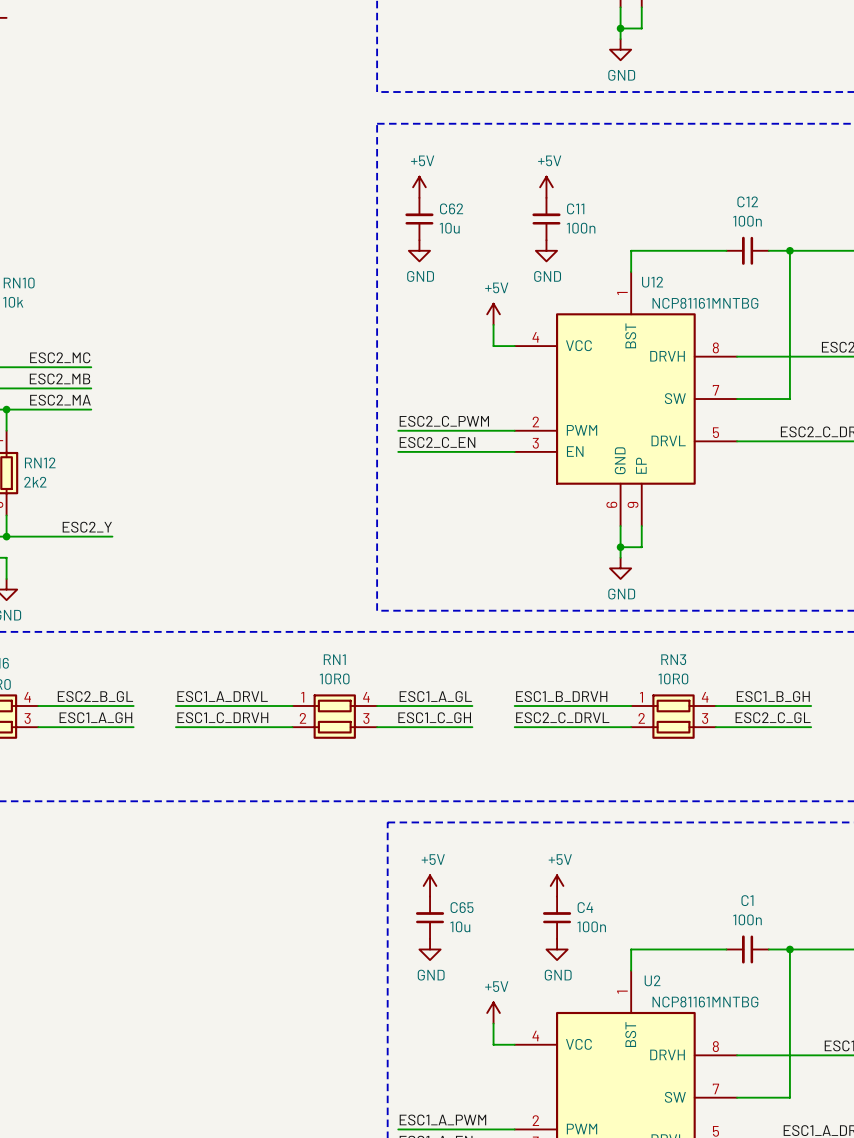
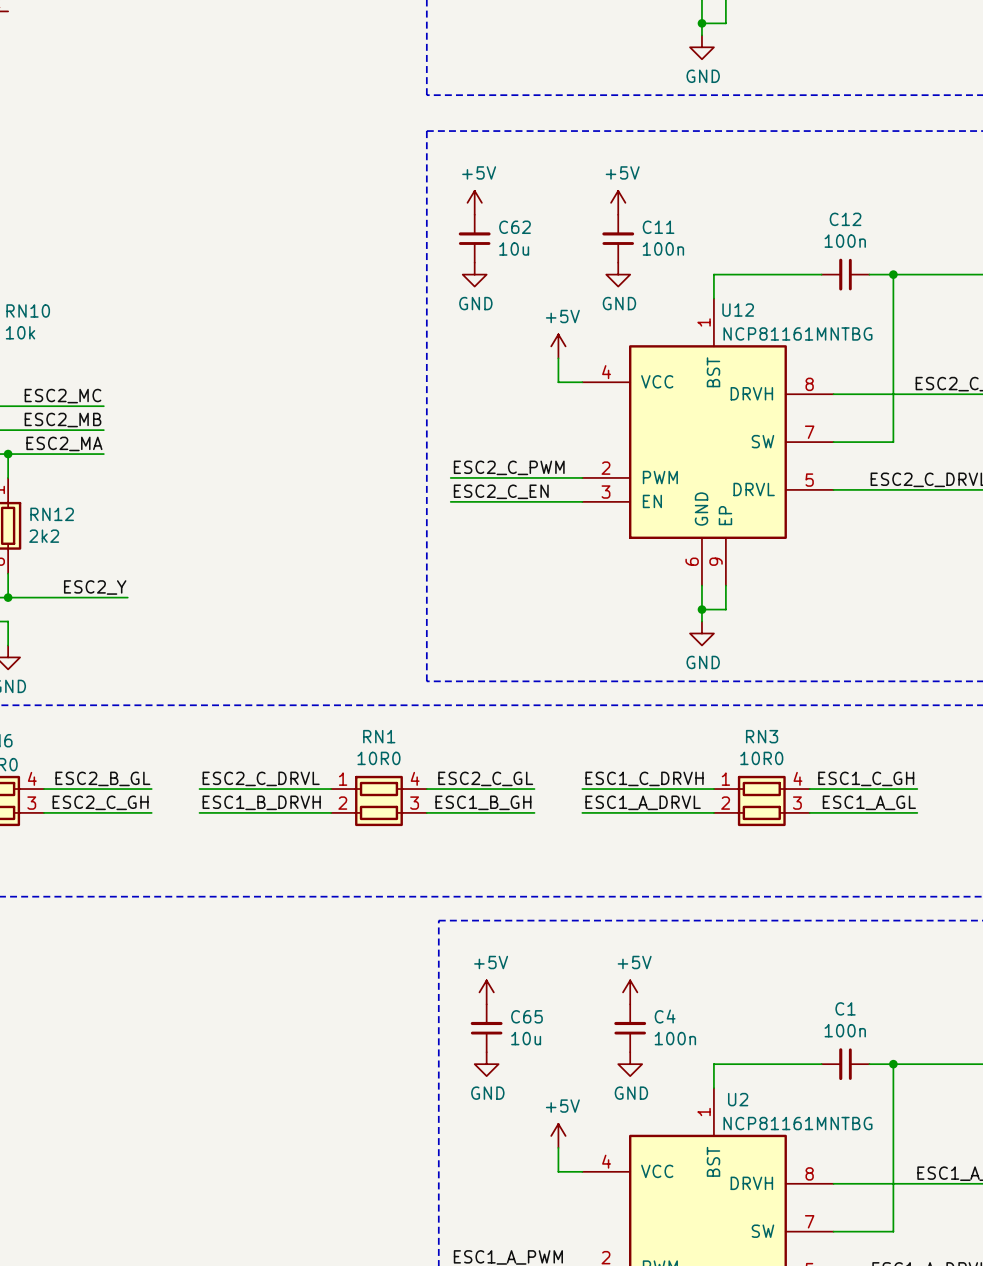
label: ESC1_A_DRVL (222, 696) -> ESC2_C_DRVL (261, 778)
label: ESC1_A_GL (435, 696) -> ESC2_C_GL (485, 778)
label: ESC1_B_DRVH (561, 696) -> ESC1_C_DRVH (644, 778)
label: ESC1_B_GH (773, 696) -> ESC1_C_GH (866, 778)
label: ESC1_A_GH (95, 717) -> ESC2_C_GH (100, 802)
label: ESC1_C_DRVH (222, 717) -> ESC1_B_DRVH (261, 802)
label: ESC1_C_GH (434, 717) -> ESC1_B_GH (483, 802)
label: ESC2_C_DRVL (562, 717) -> ESC1_A_DRVL (643, 802)
label: ESC2_C_GL (773, 717) -> ESC1_A_GL (869, 802)

